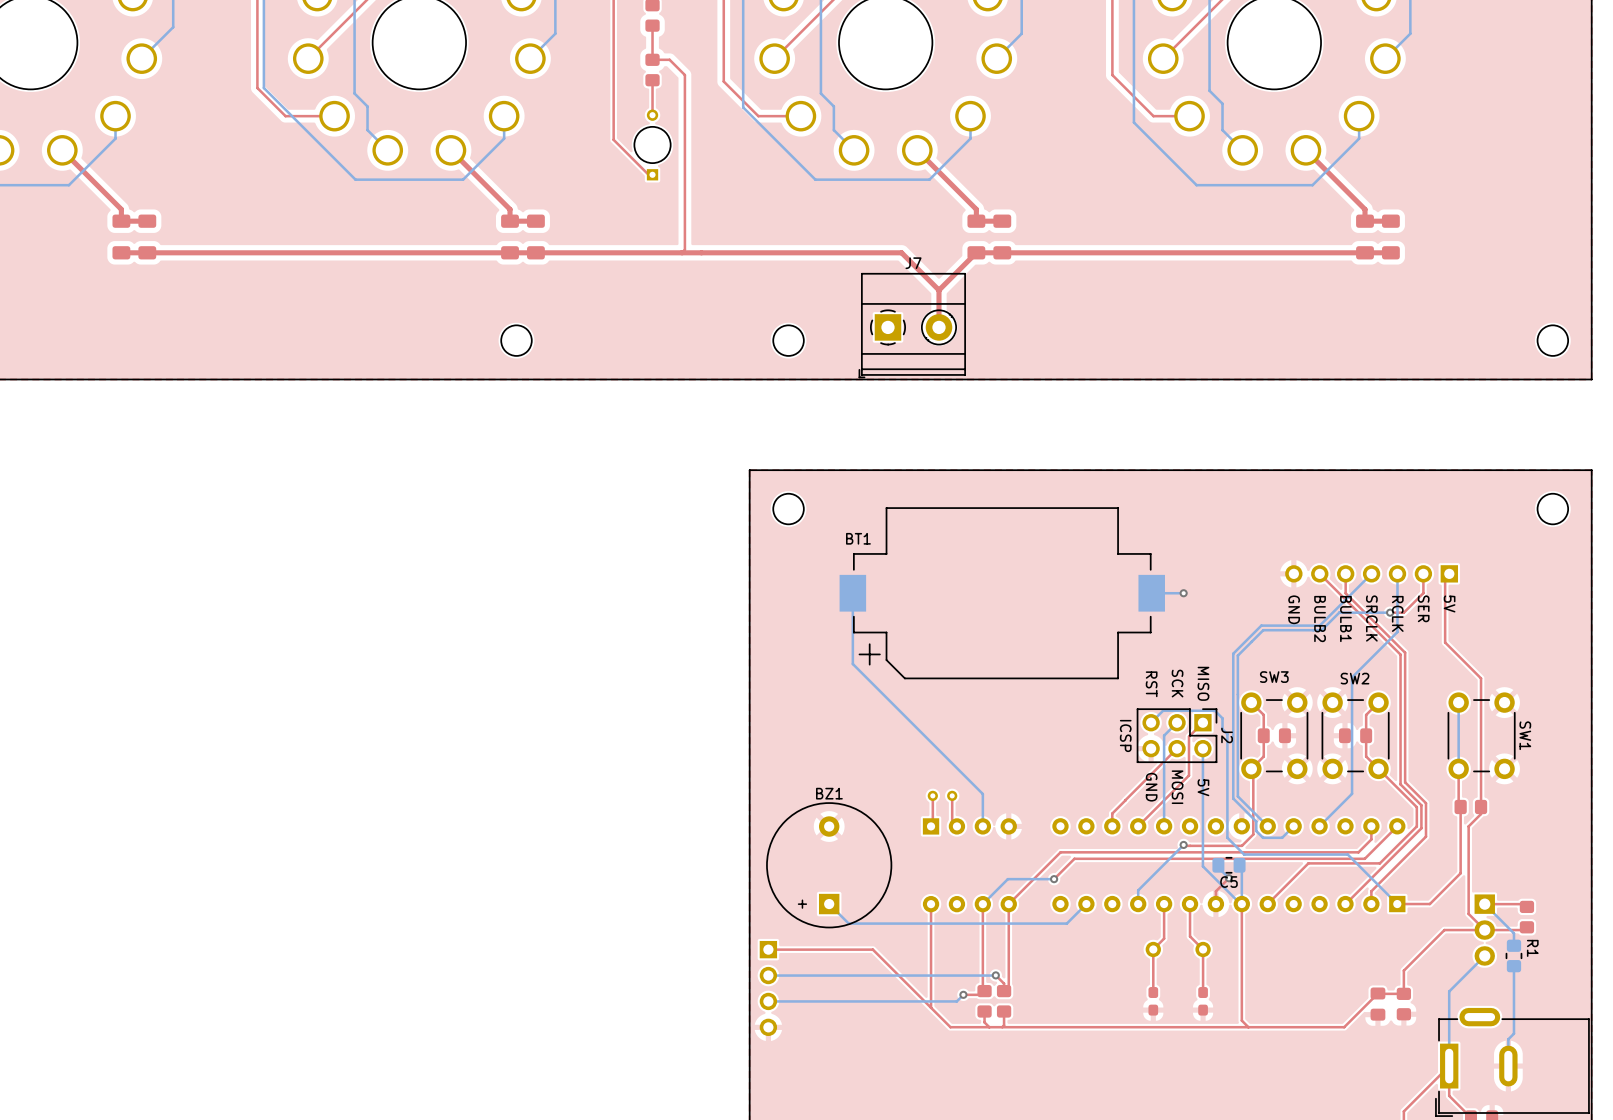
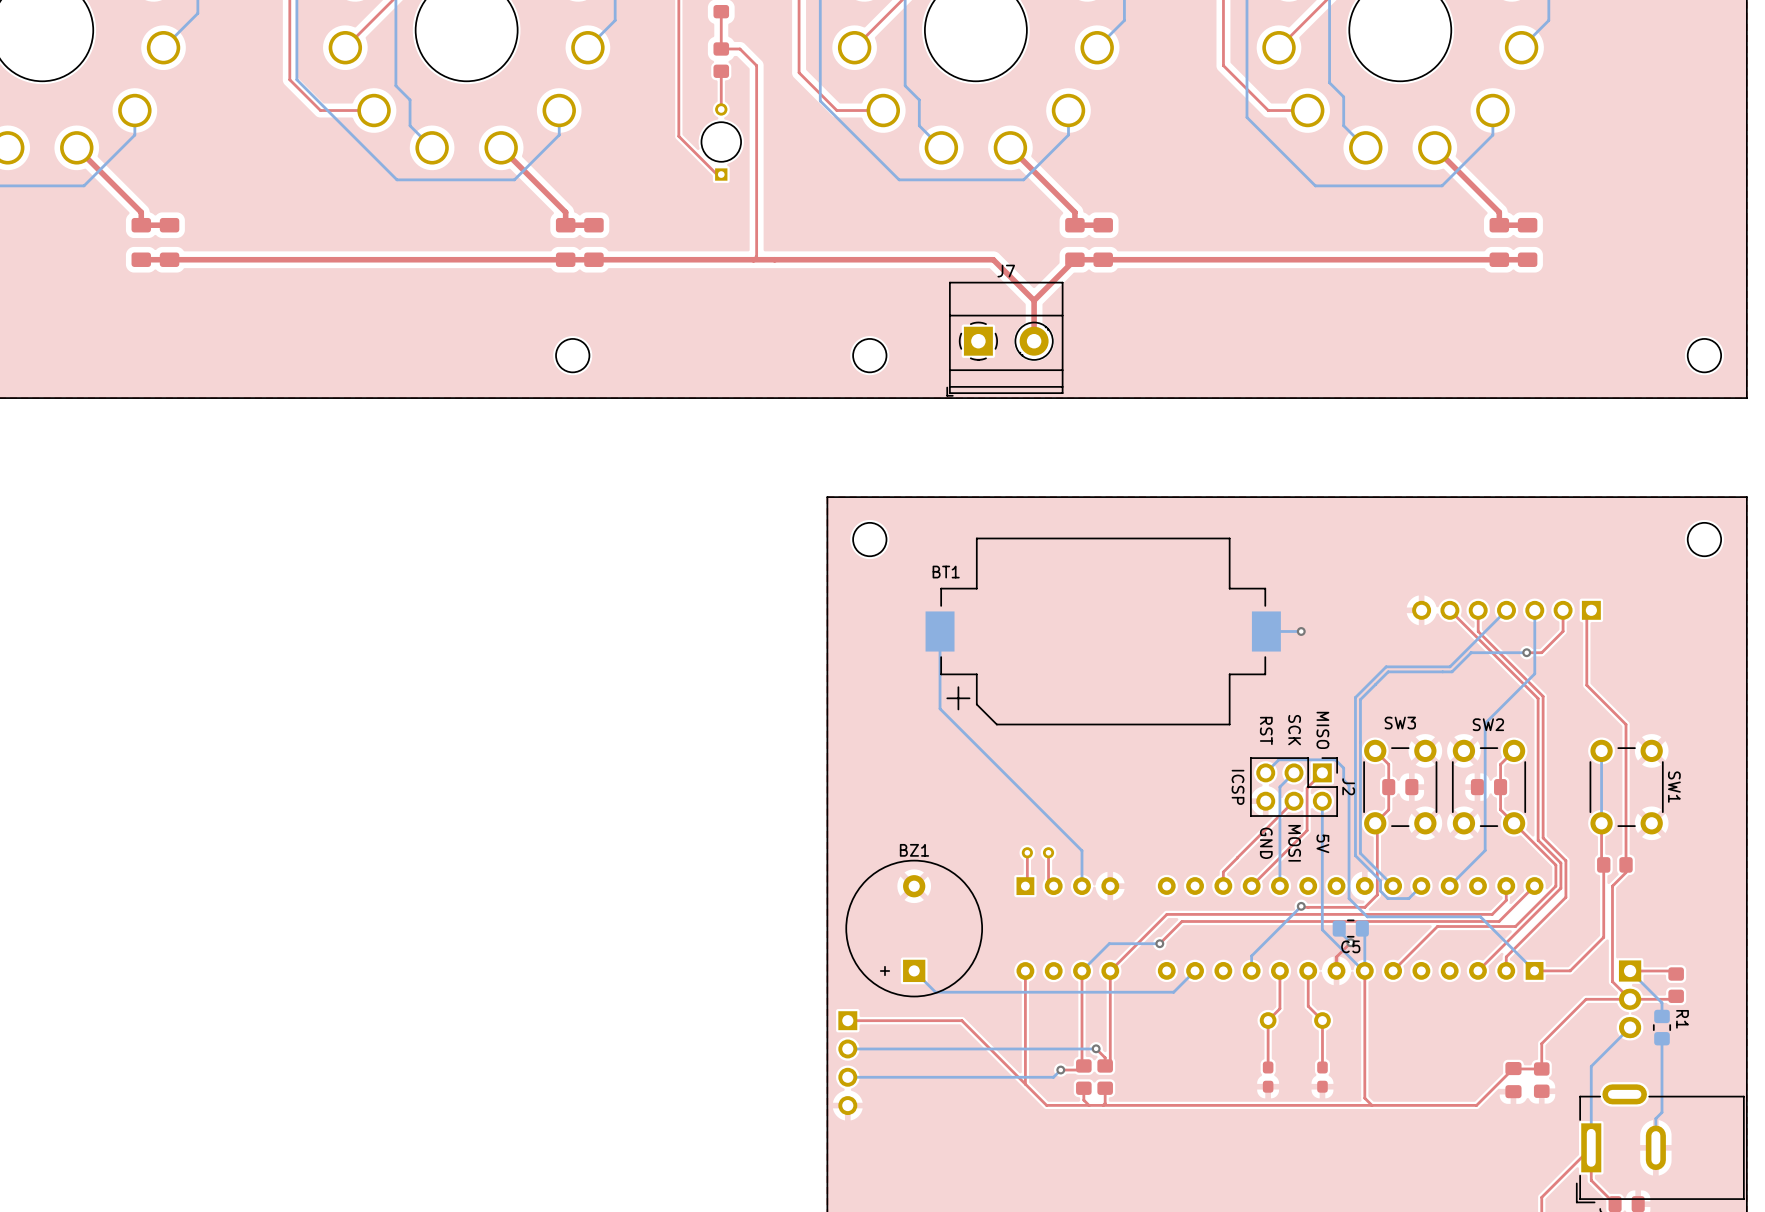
text: 5V (1449, 603) -> none
text: SER (1423, 608) -> none
text: GND (1294, 609) -> none
text: RCLK (1397, 613) -> none
text: SRCLK (1371, 618) -> none
text: BULB2 (1320, 619) -> none
text: BULB1 (1345, 619) -> none

